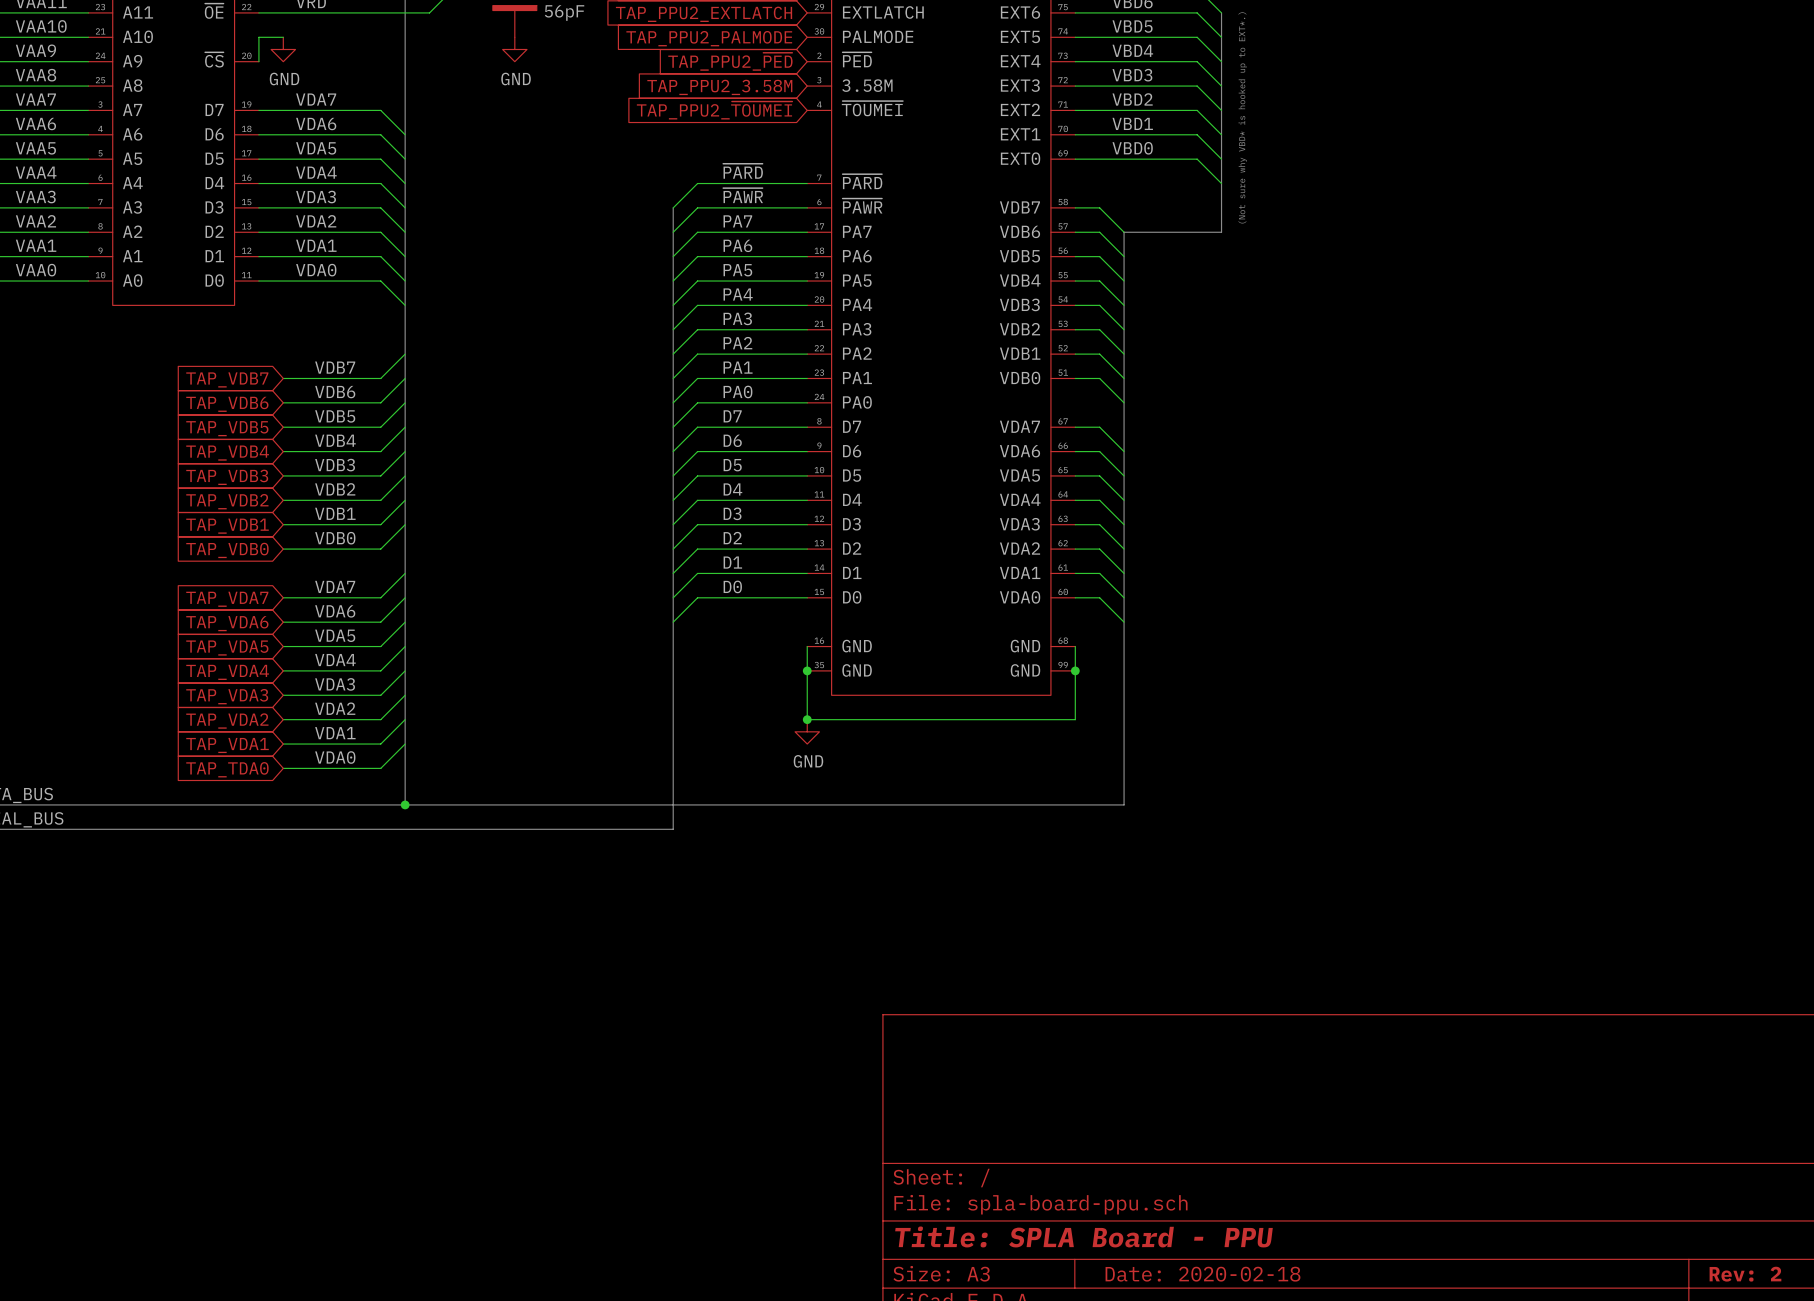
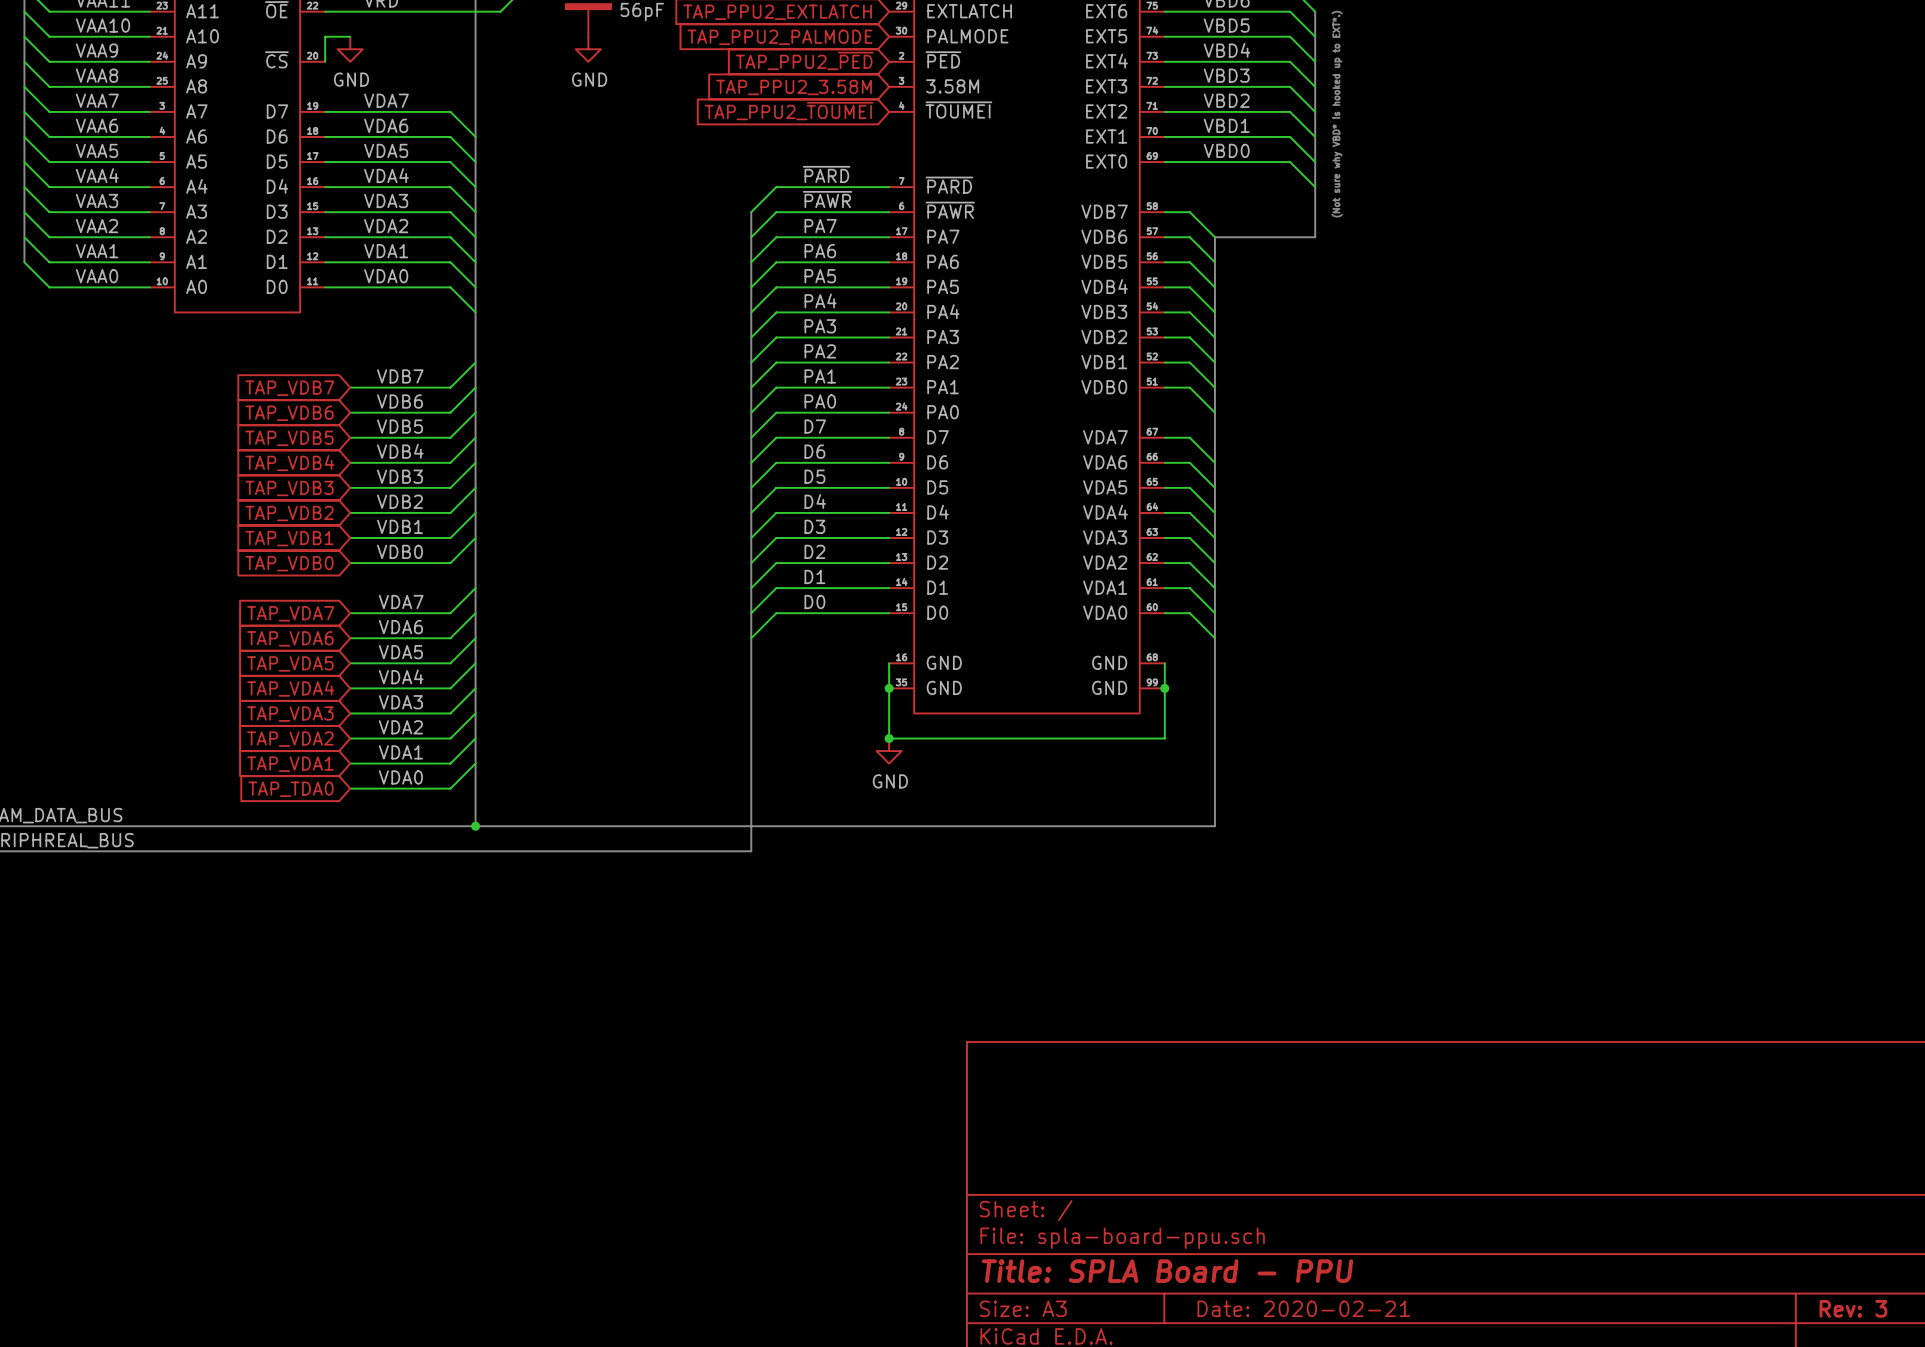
title block: Date: 2020-02-18 (1202, 1274) -> Date: 2020-02-21 (1303, 1308)
title block: Rev: 2 (1745, 1274) -> Rev: 3 (1853, 1308)

